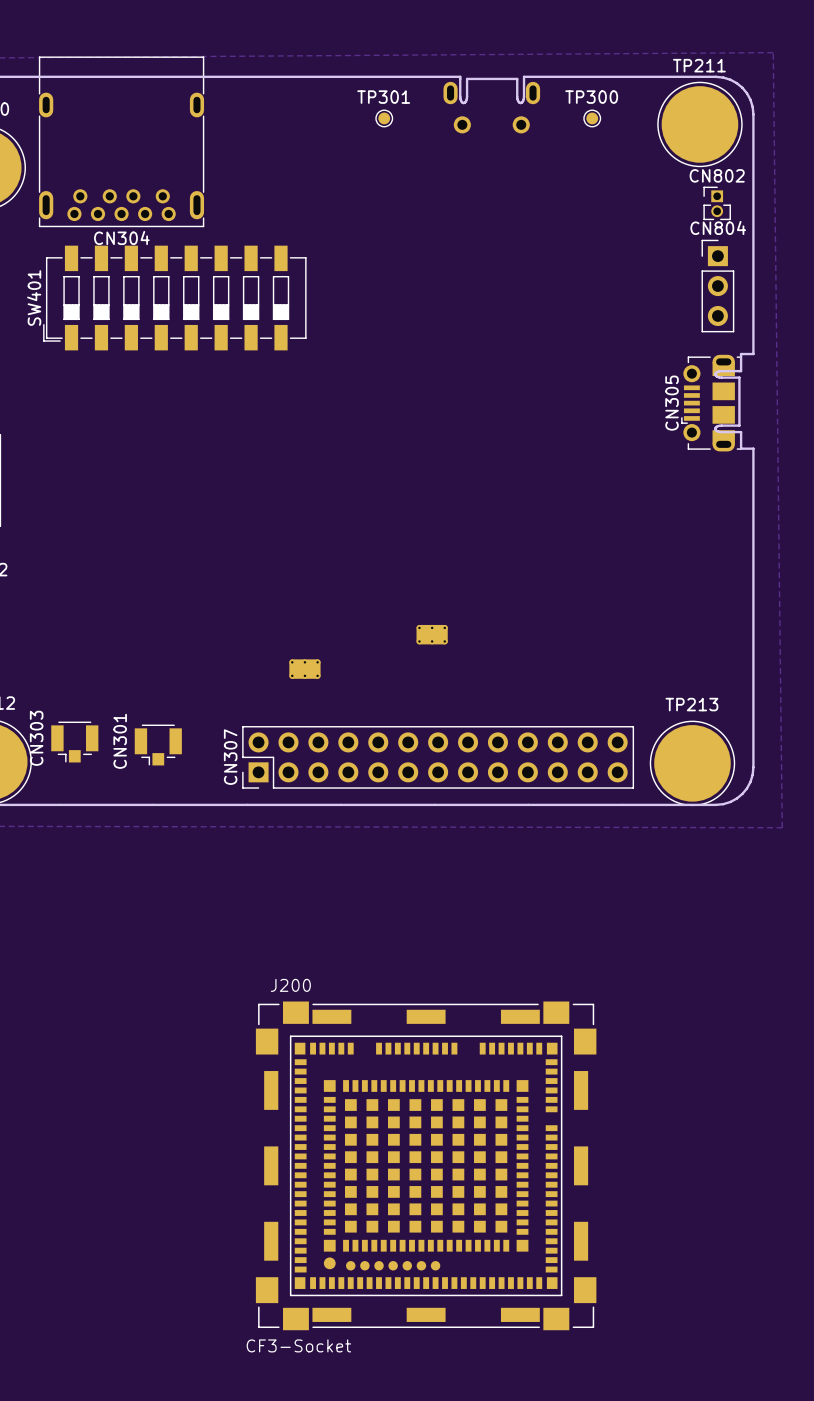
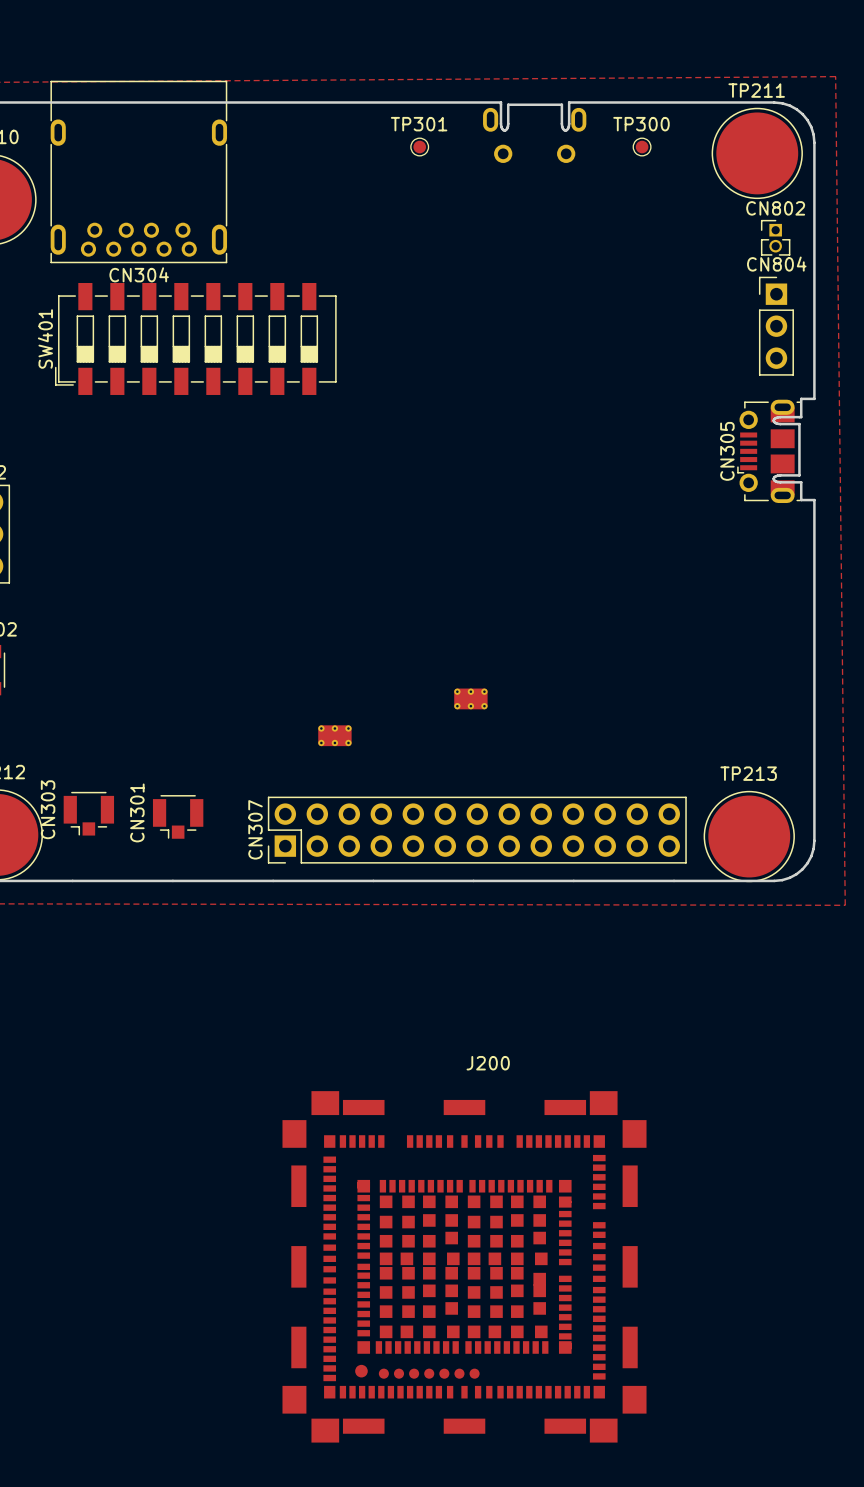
J200 name position: J200 (290, 985) -> J200 (488, 1063)
J200 footprint: [255, 1001, 597, 1331] -> [282, 1091, 647, 1443]
J200 value: CF3-Socket (298, 1345) -> none

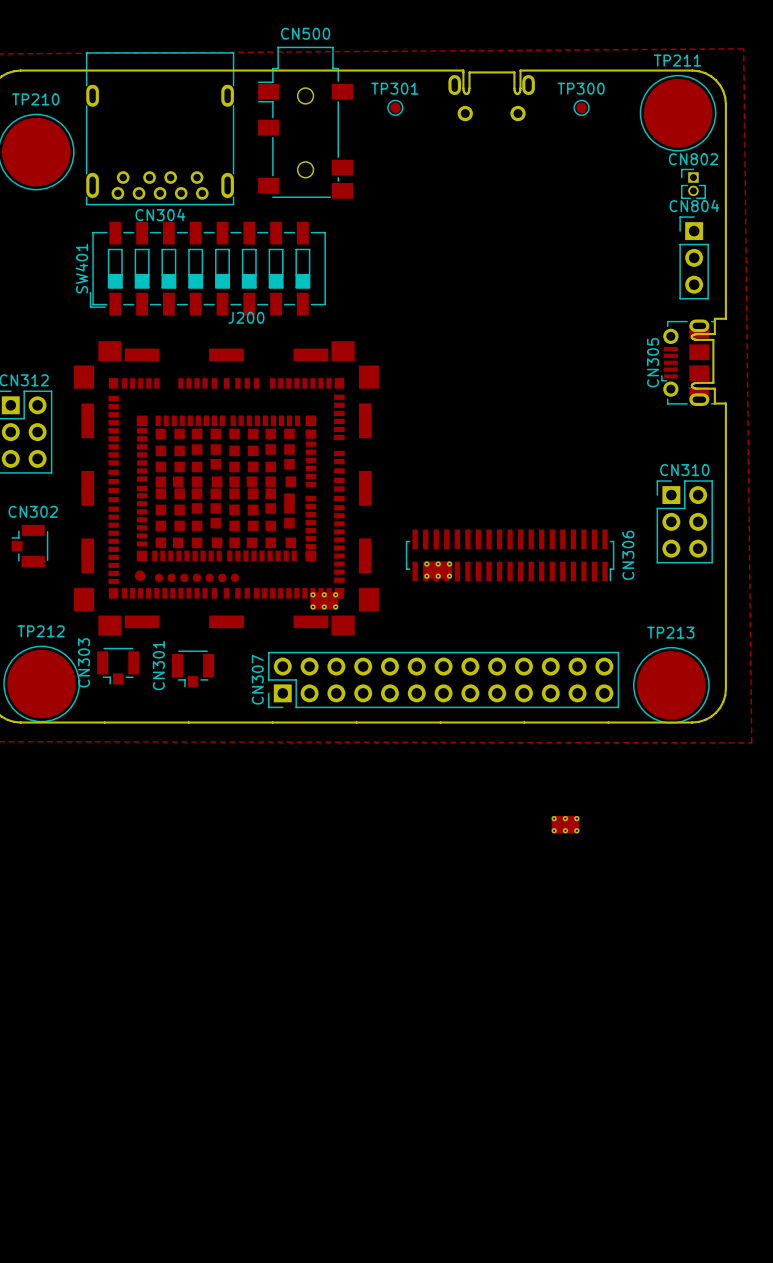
CN500: none -> (305, 122)
CN310: none -> (684, 521)
CN306: none -> (510, 555)
part: none -> (565, 824)
J200 position: (464, 1266) -> (226, 488)

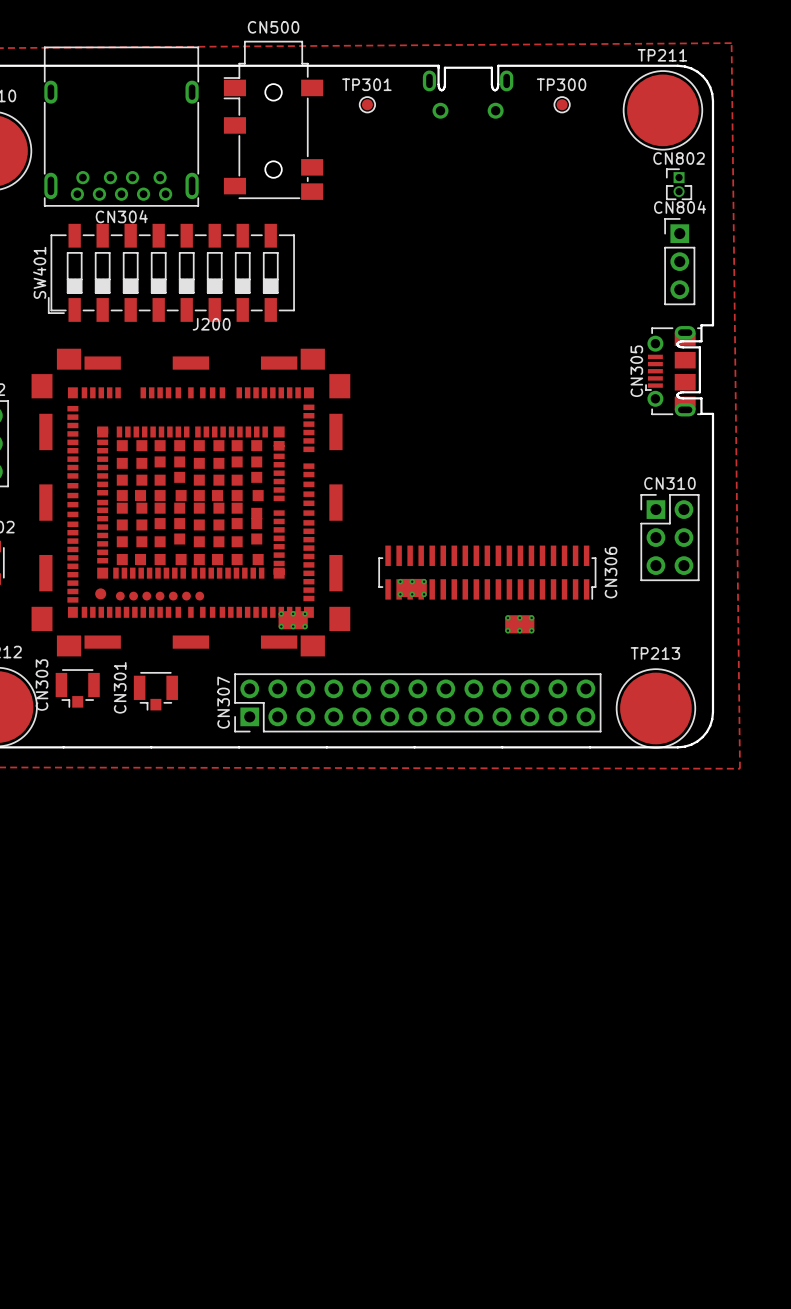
part position: (565, 824) -> (519, 624)

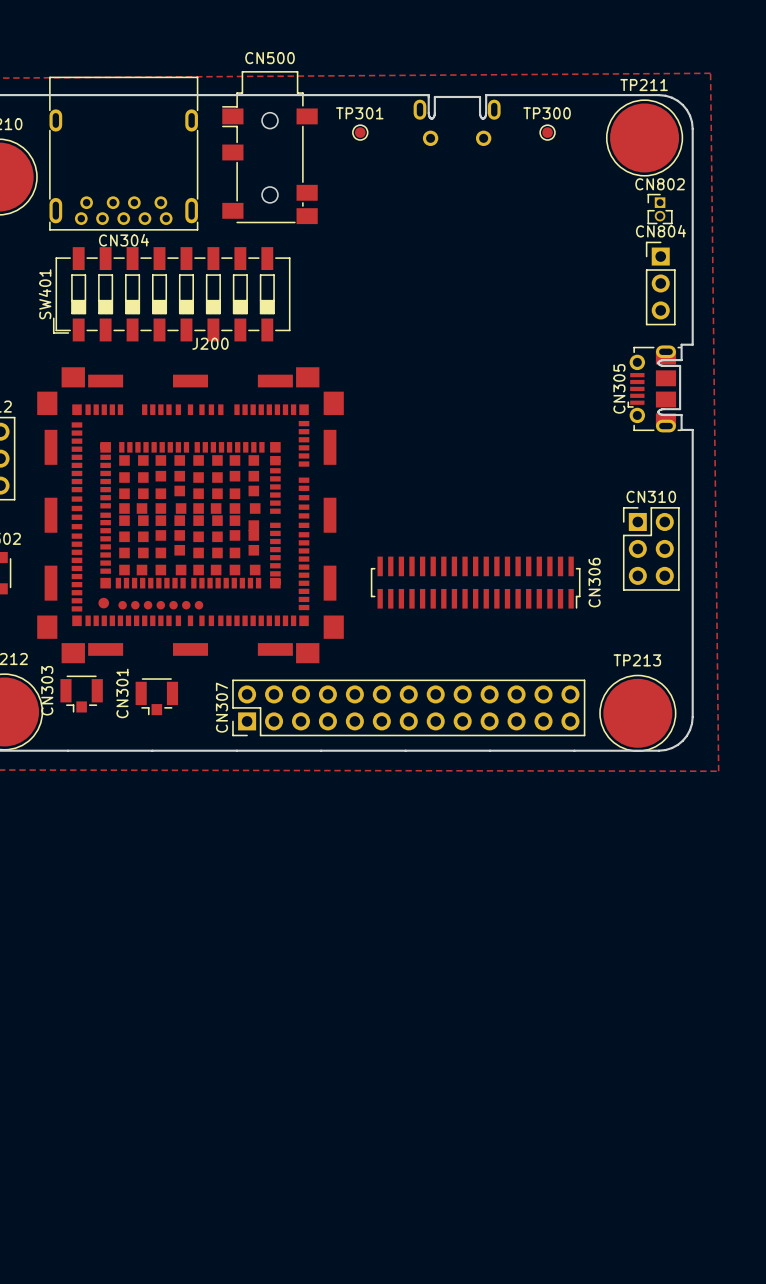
part: (412, 588) -> none
part: (293, 620) -> none
part: (519, 624) -> none

